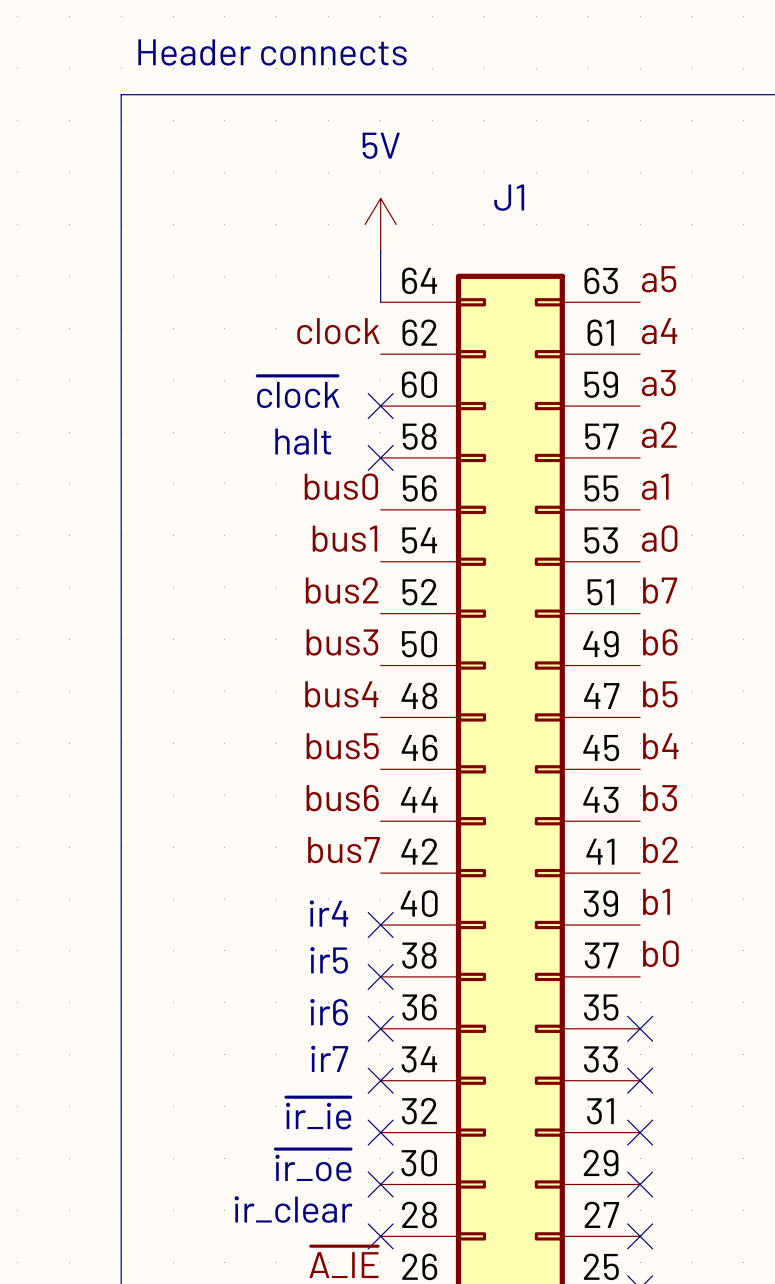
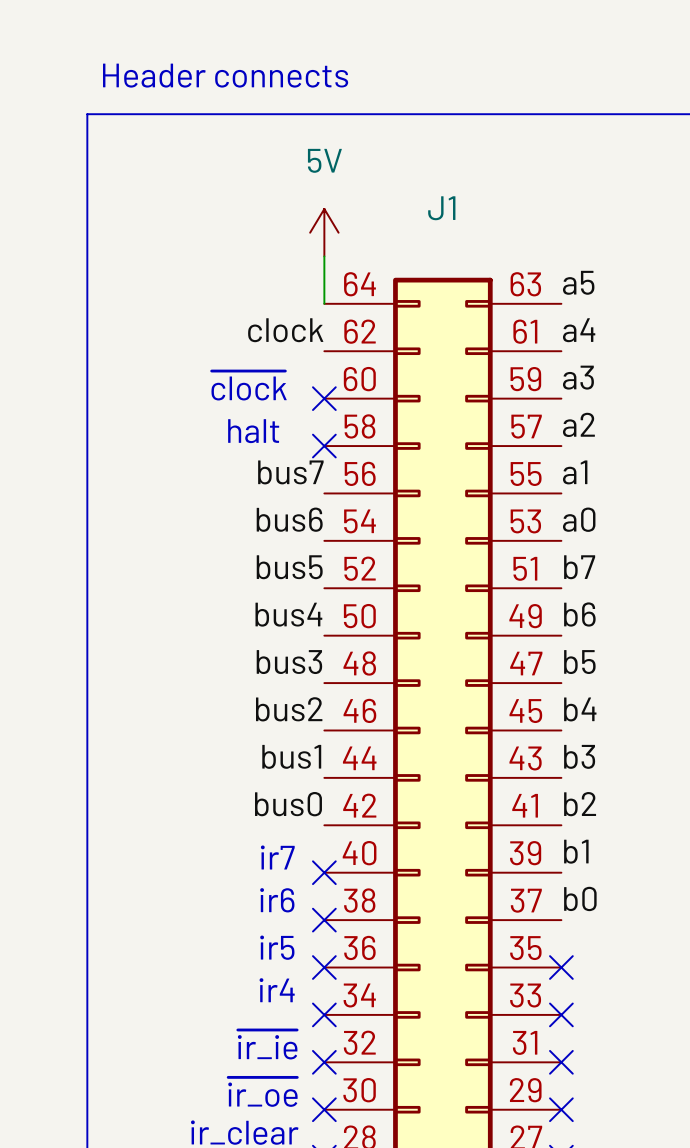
label: bus0 (341, 486) -> bus7 (290, 472)
label: bus1 (344, 538) -> bus6 (289, 519)
label: bus2 (342, 590) -> bus5 (289, 567)
label: bus3 (342, 642) -> bus4 (288, 614)
label: bus4 (341, 694) -> bus3 (289, 662)
label: bus5 (342, 746) -> bus2 (289, 709)
label: bus6 (342, 798) -> bus1 (291, 756)
label: bus7 (344, 850) -> bus0 (288, 804)
text position: ir4 (328, 913) -> ir4 (277, 990)
text position: ir5 (329, 960) -> ir5 (277, 947)
text position: ir6 (329, 1012) -> ir6 (277, 900)
text position: ir7 (329, 1058) -> ir7 (277, 857)

